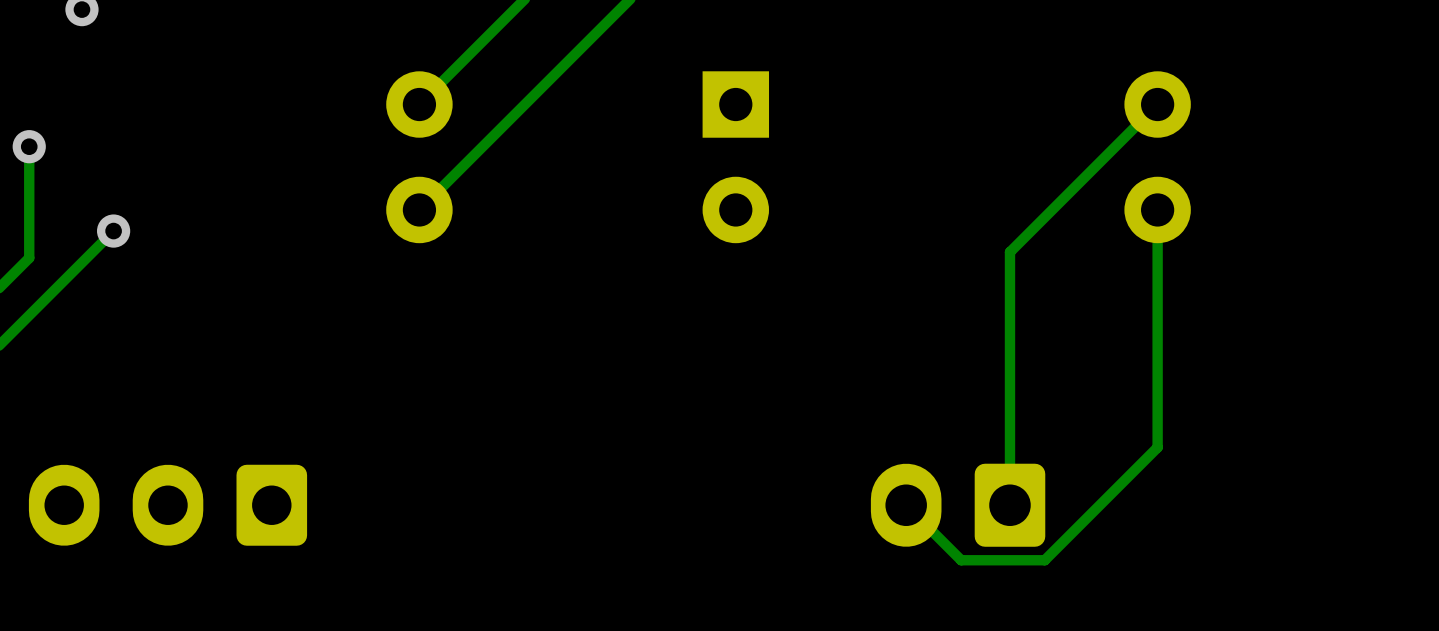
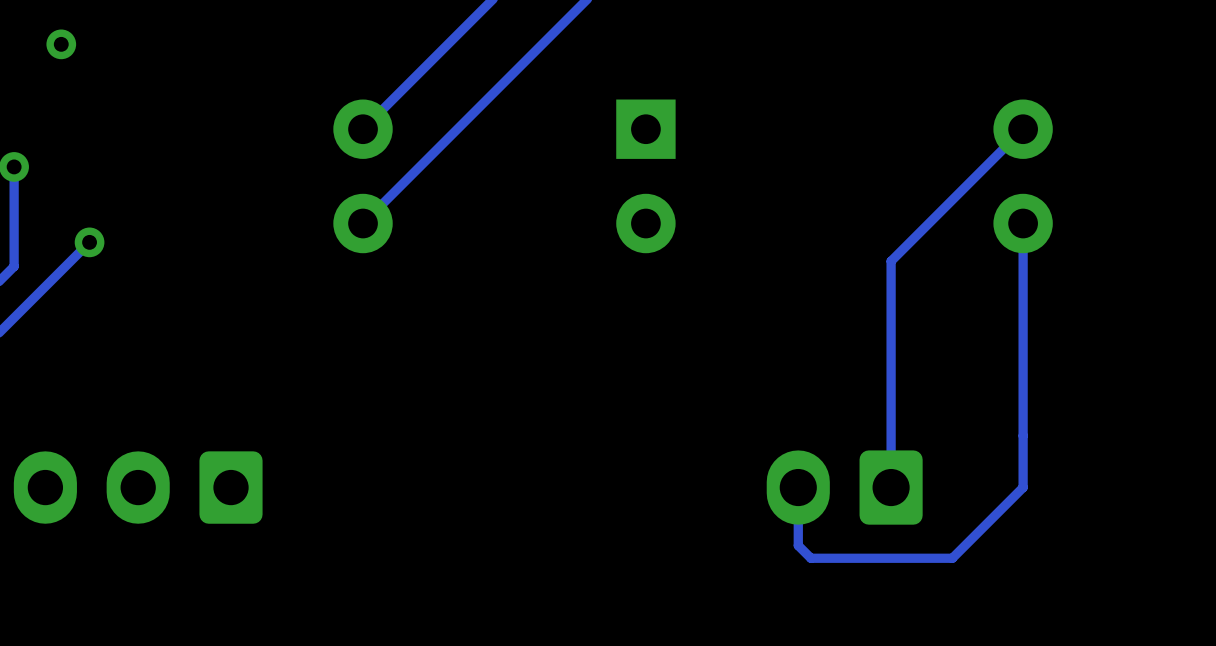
track: (1157, 447) (1044, 560) (961, 560) (906, 505) -> (1023, 435) (1023, 487) (952, 558) (810, 558) (798, 545) (798, 487)

